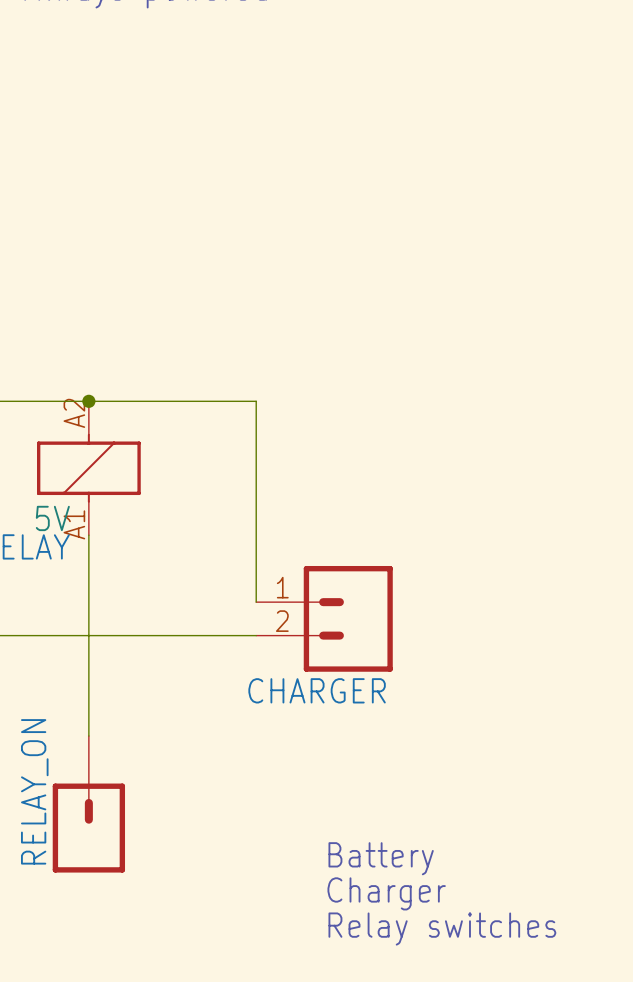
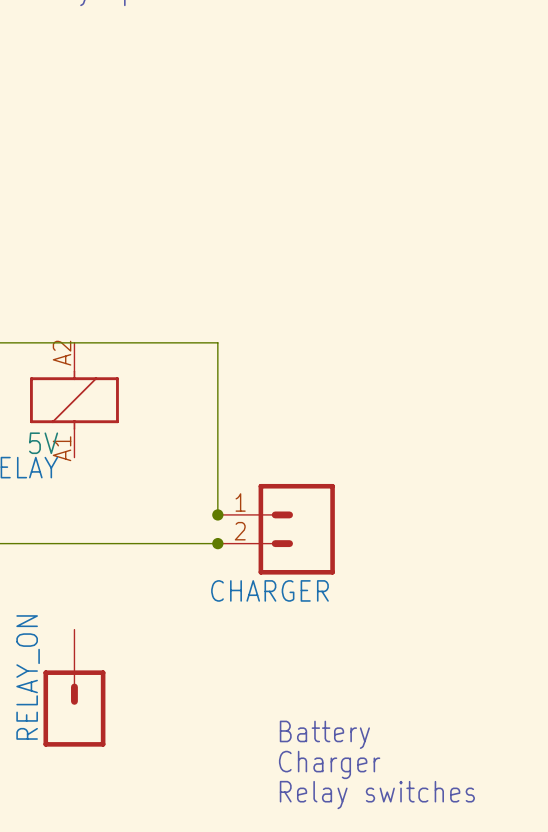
junction: (88, 401) -> none
wire: (88, 535) (88, 736) -> none
junction: none -> (217, 514)
junction: none -> (217, 543)

